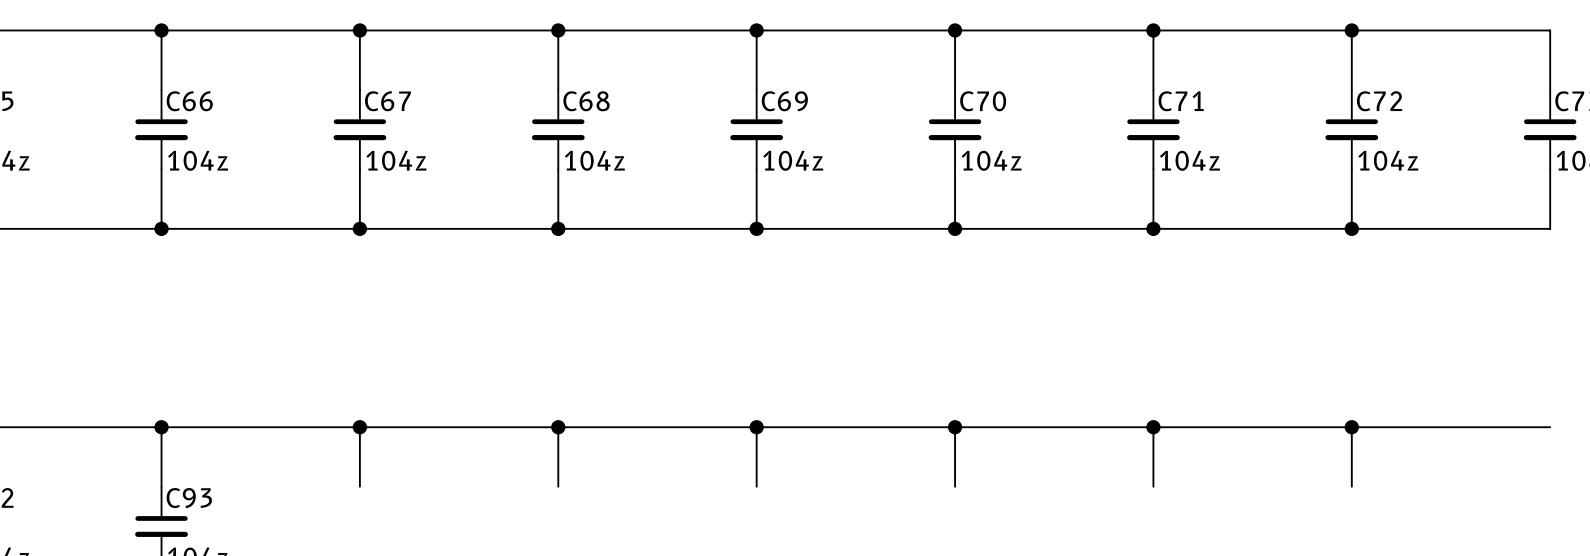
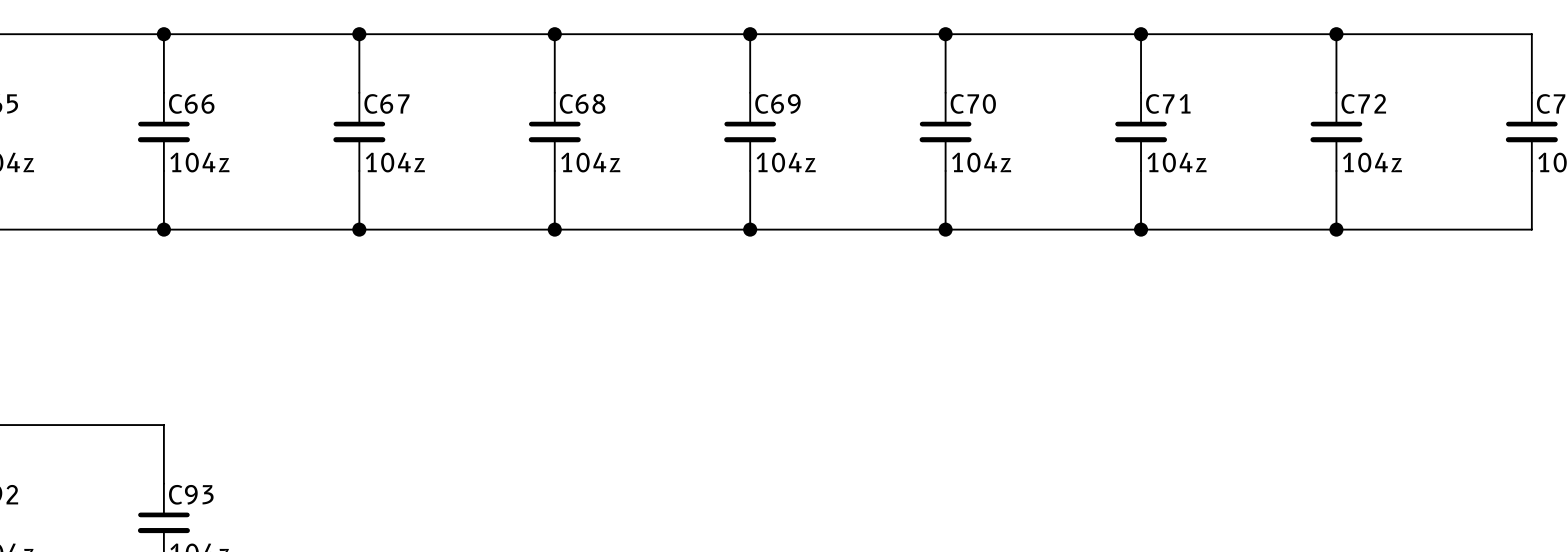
wire: (161, 427) (1550, 427) -> none
junction: (161, 427) -> none
wire: (359, 427) (359, 486) -> none
junction: (359, 427) -> none
wire: (558, 427) (558, 486) -> none
junction: (558, 427) -> none
wire: (756, 427) (756, 486) -> none
junction: (756, 427) -> none
wire: (955, 427) (955, 486) -> none
junction: (955, 427) -> none
wire: (1153, 427) (1153, 486) -> none
junction: (1153, 427) -> none
wire: (1351, 427) (1351, 486) -> none
junction: (1351, 427) -> none

